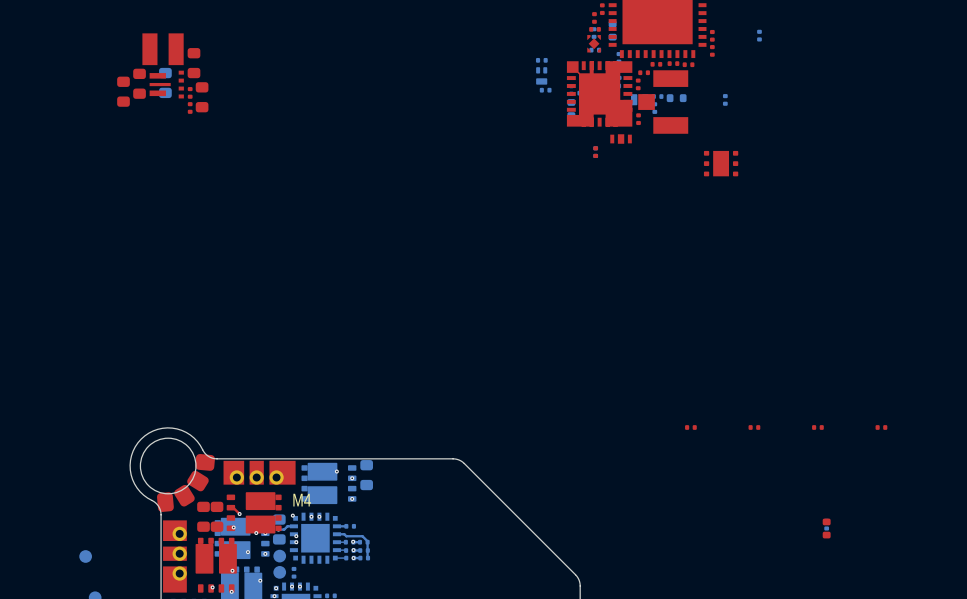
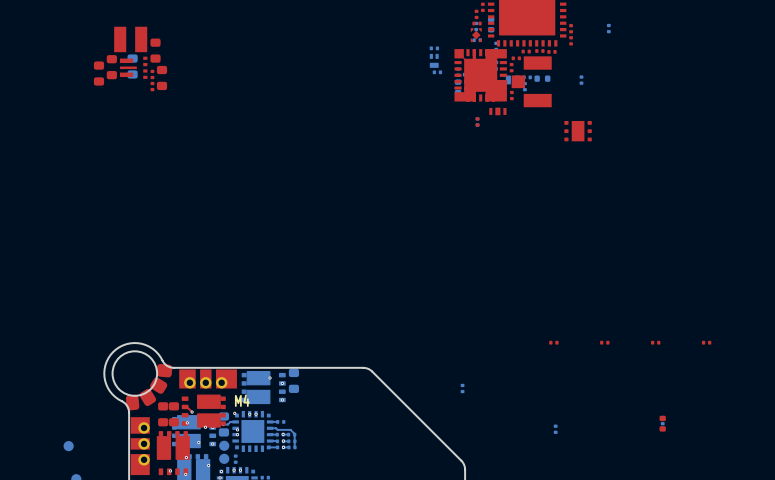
part: none -> (462, 388)
part: none -> (555, 429)

